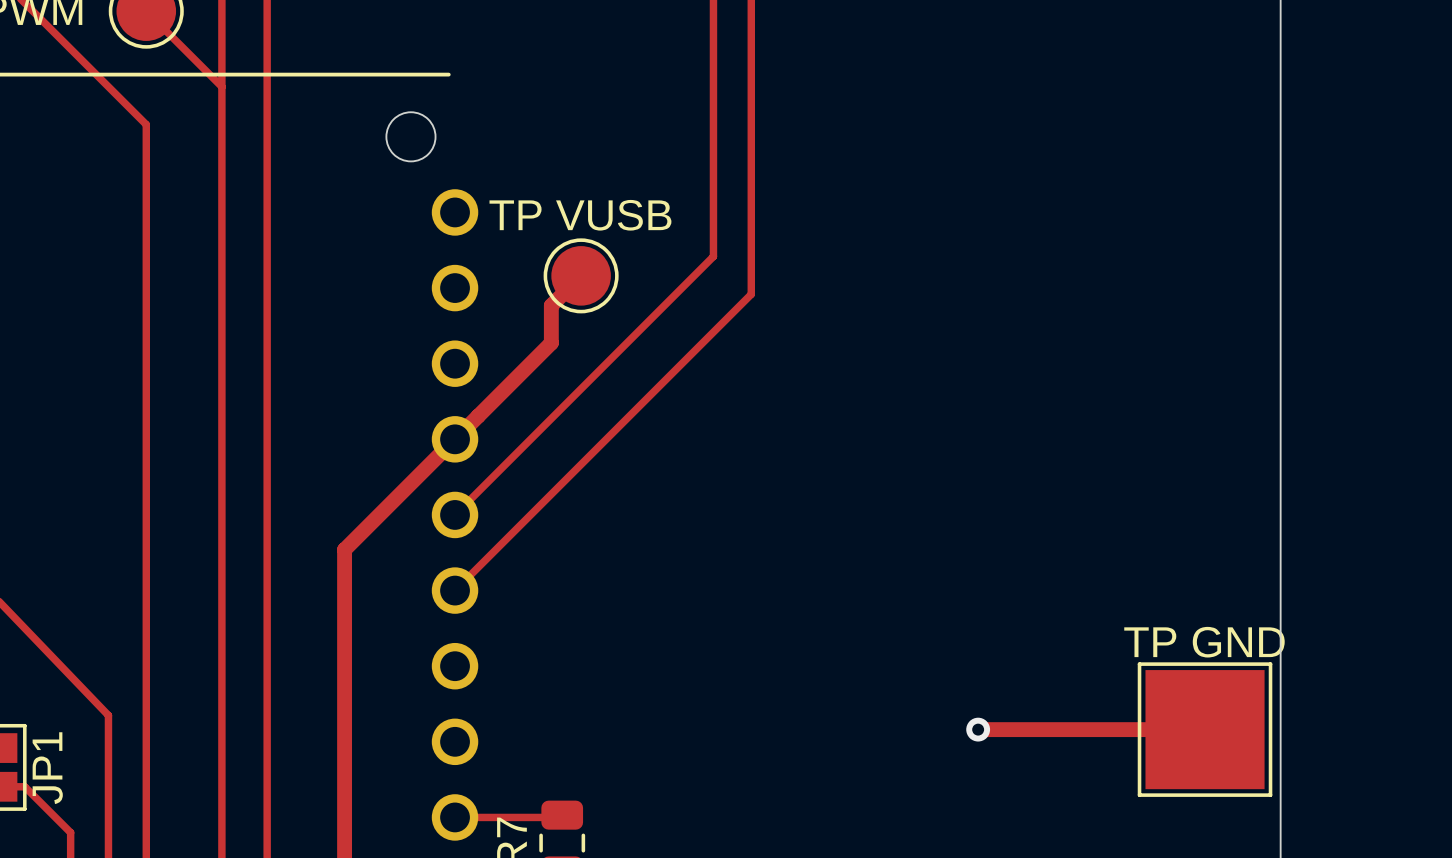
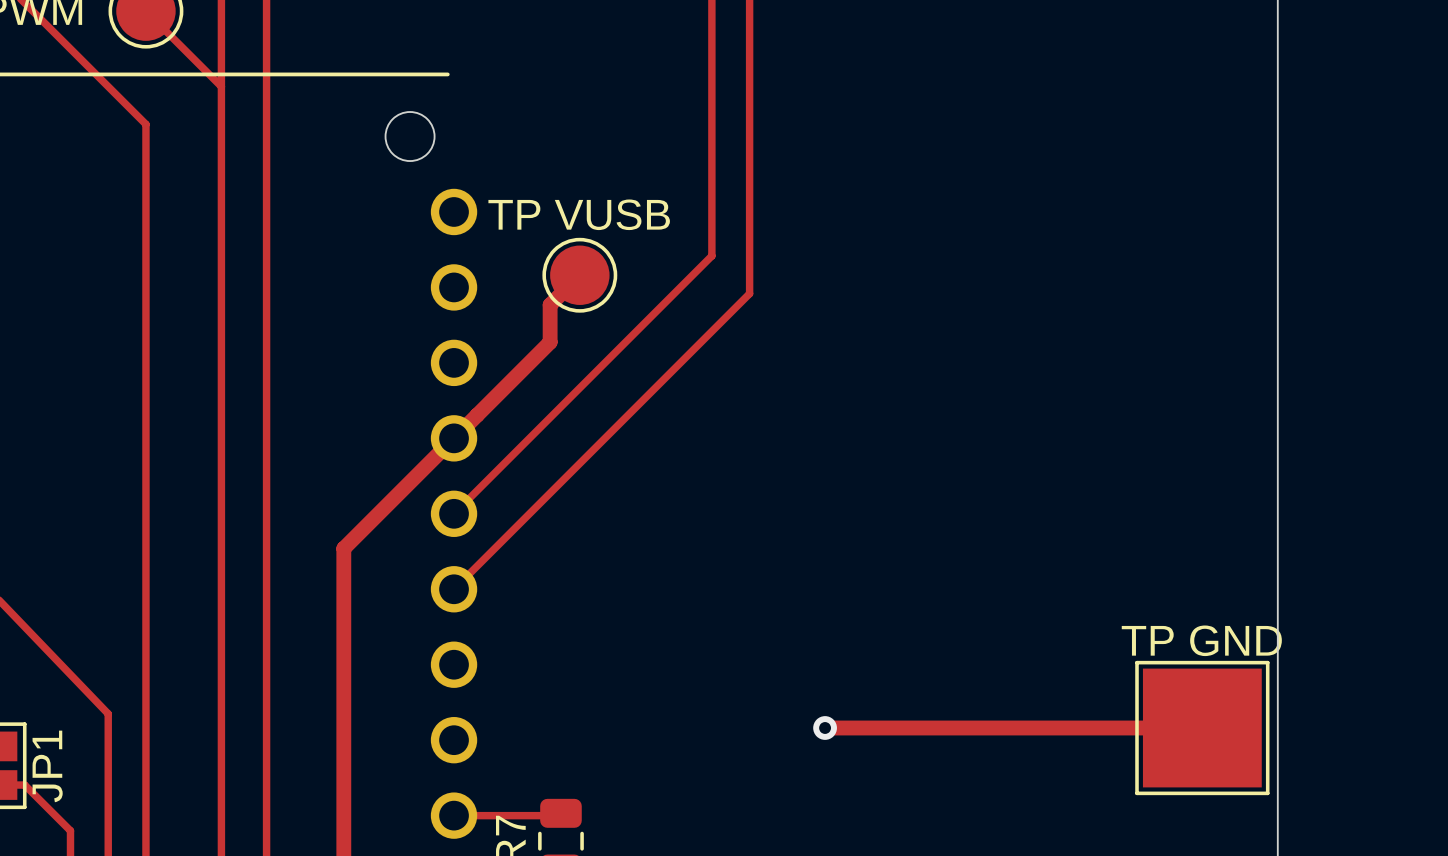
top track: none -> (825, 728) (975, 728)
via position: (978, 729) -> (825, 728)

